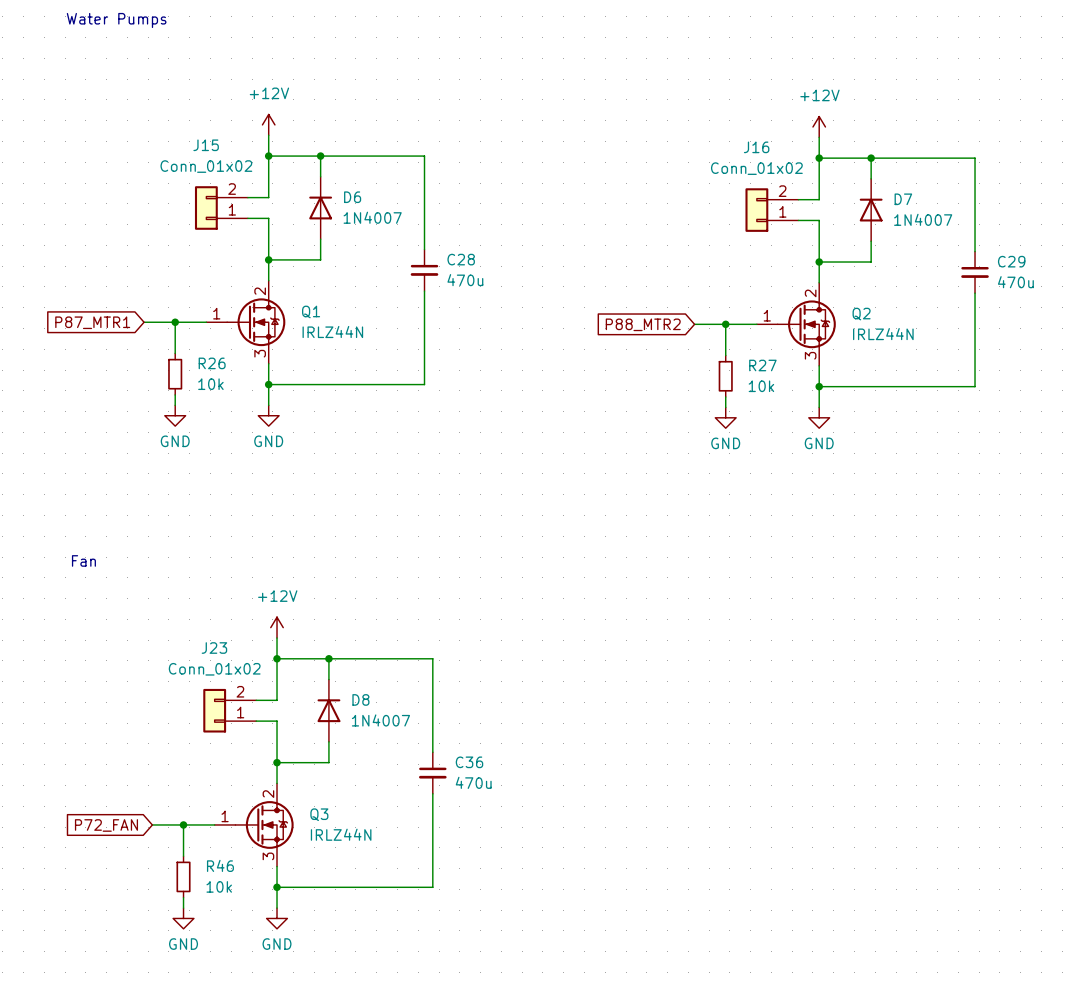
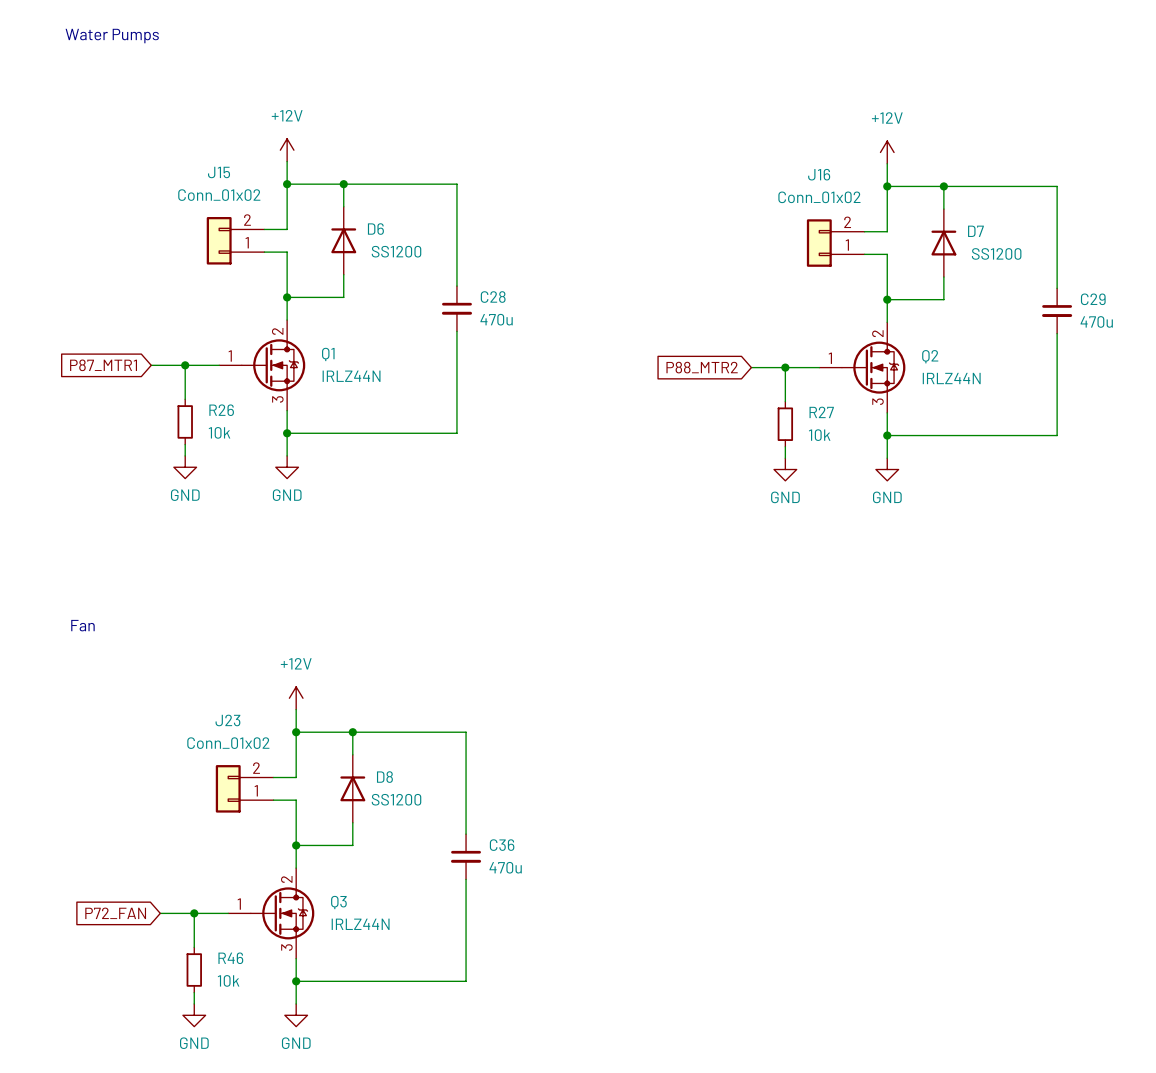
D6 value: 1N4007 (372, 217) -> SS1200 (396, 251)
D7 value: 1N4007 (923, 219) -> SS1200 (996, 253)
D8 value: 1N4007 (380, 720) -> SS1200 (396, 799)

